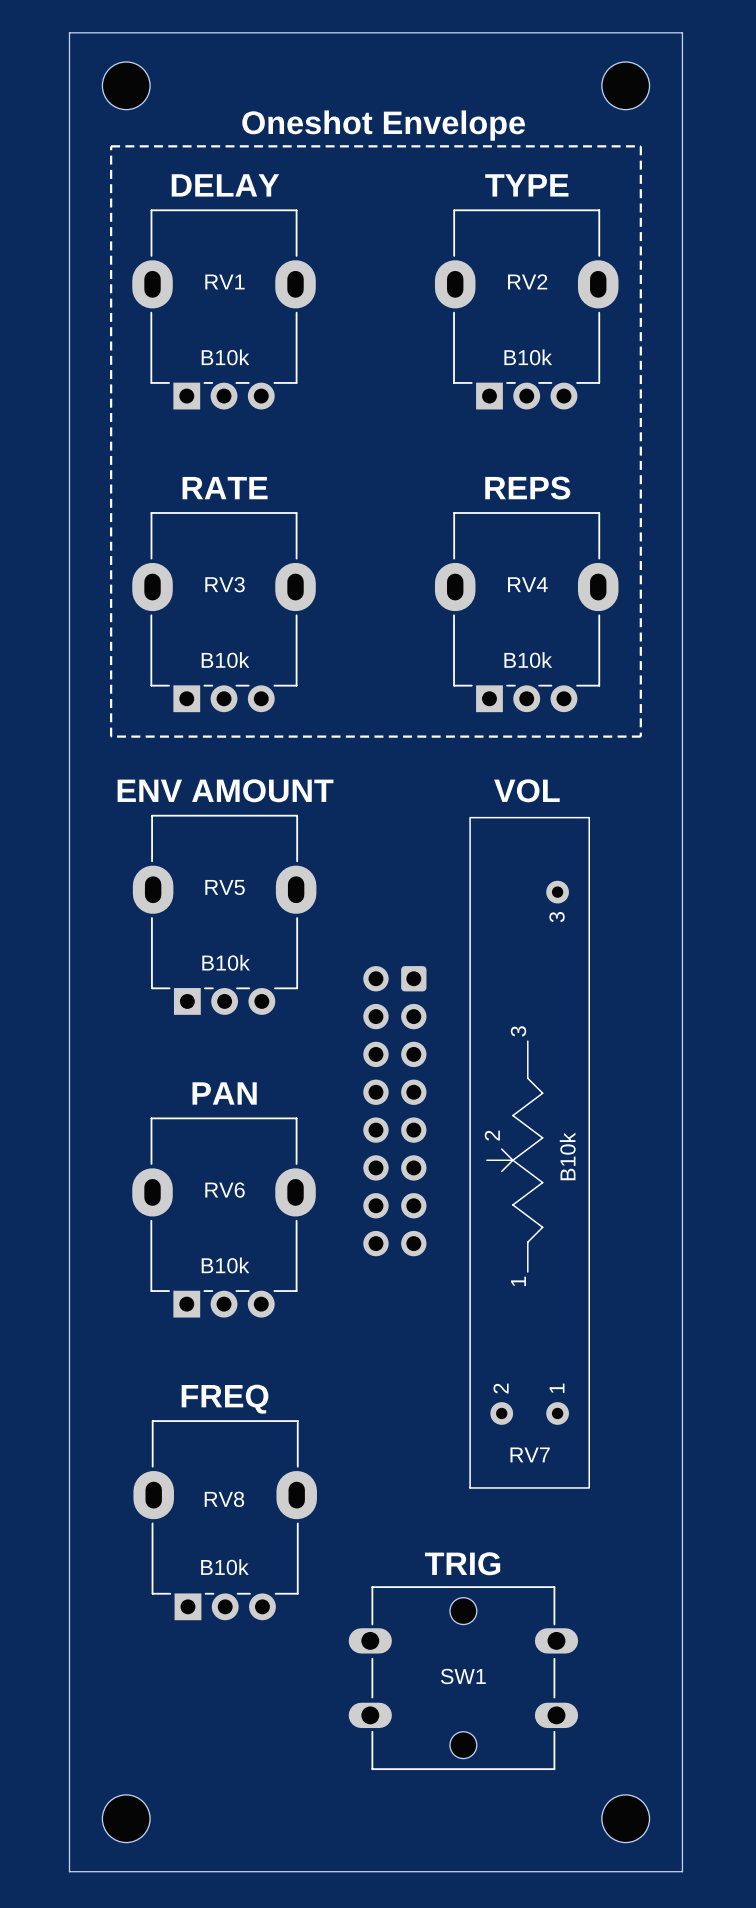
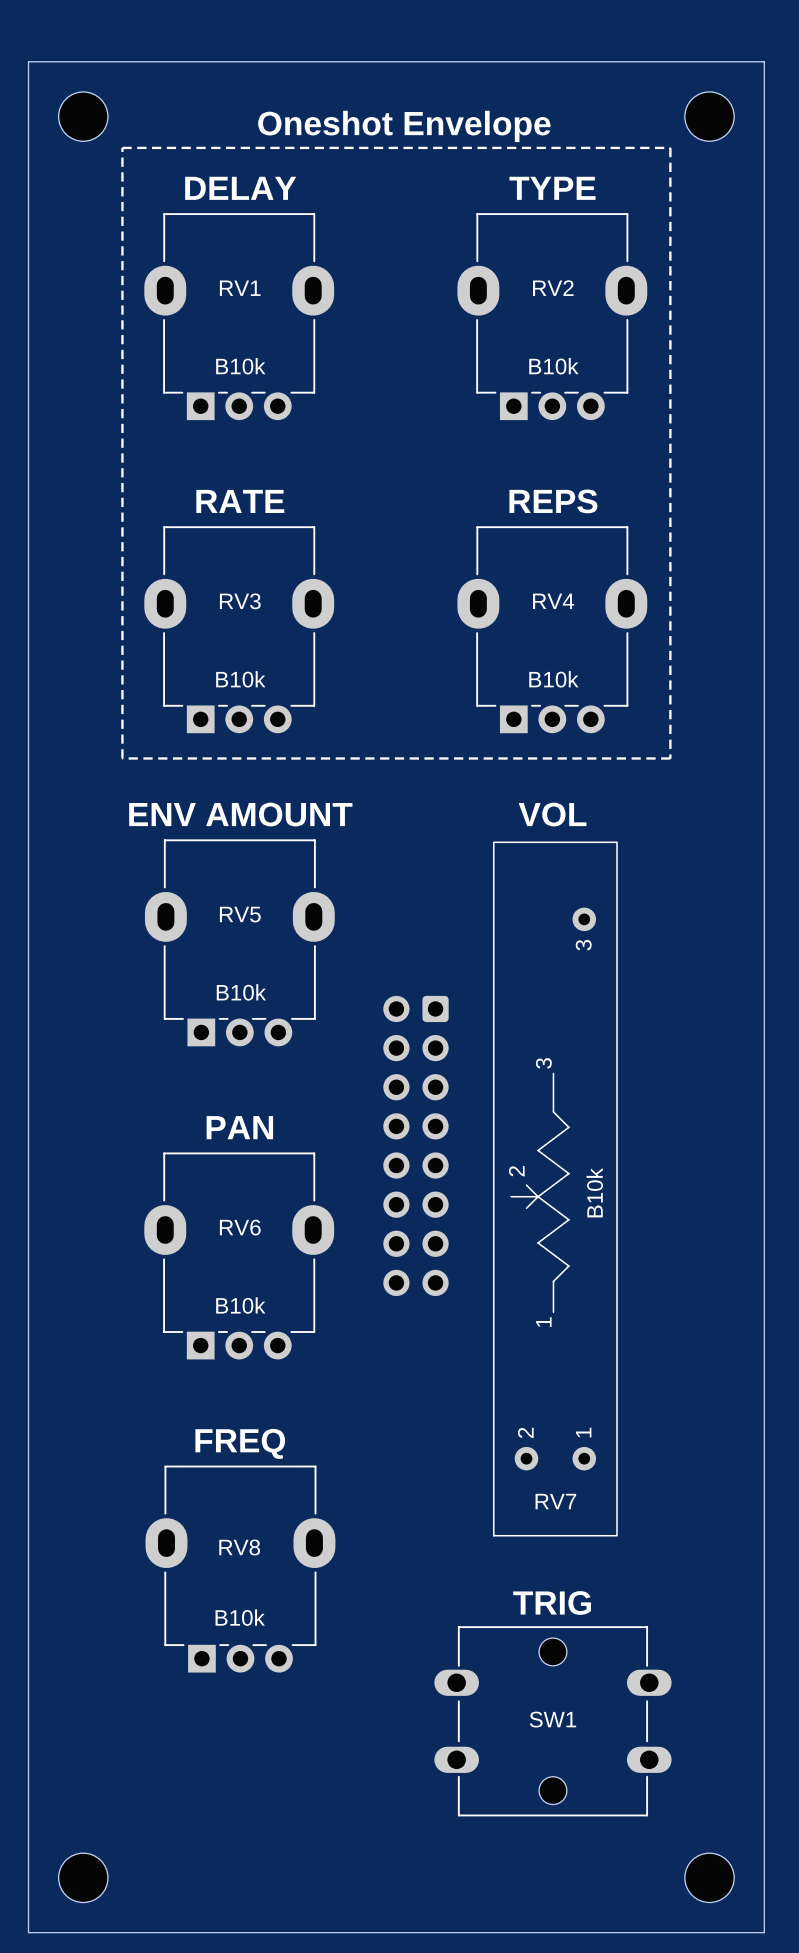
part position: (126, 85) -> (83, 116)
part position: (625, 85) -> (709, 116)
SW1 position: (463, 1678) -> (552, 1721)
part position: (126, 1818) -> (83, 1877)
part position: (625, 1818) -> (709, 1877)
board edge: (69, 1871) (69, 32) (682, 32) (682, 1871) -> (79, 1932) (28, 1932) (28, 61) (764, 61) (764, 1932) (713, 1932)

